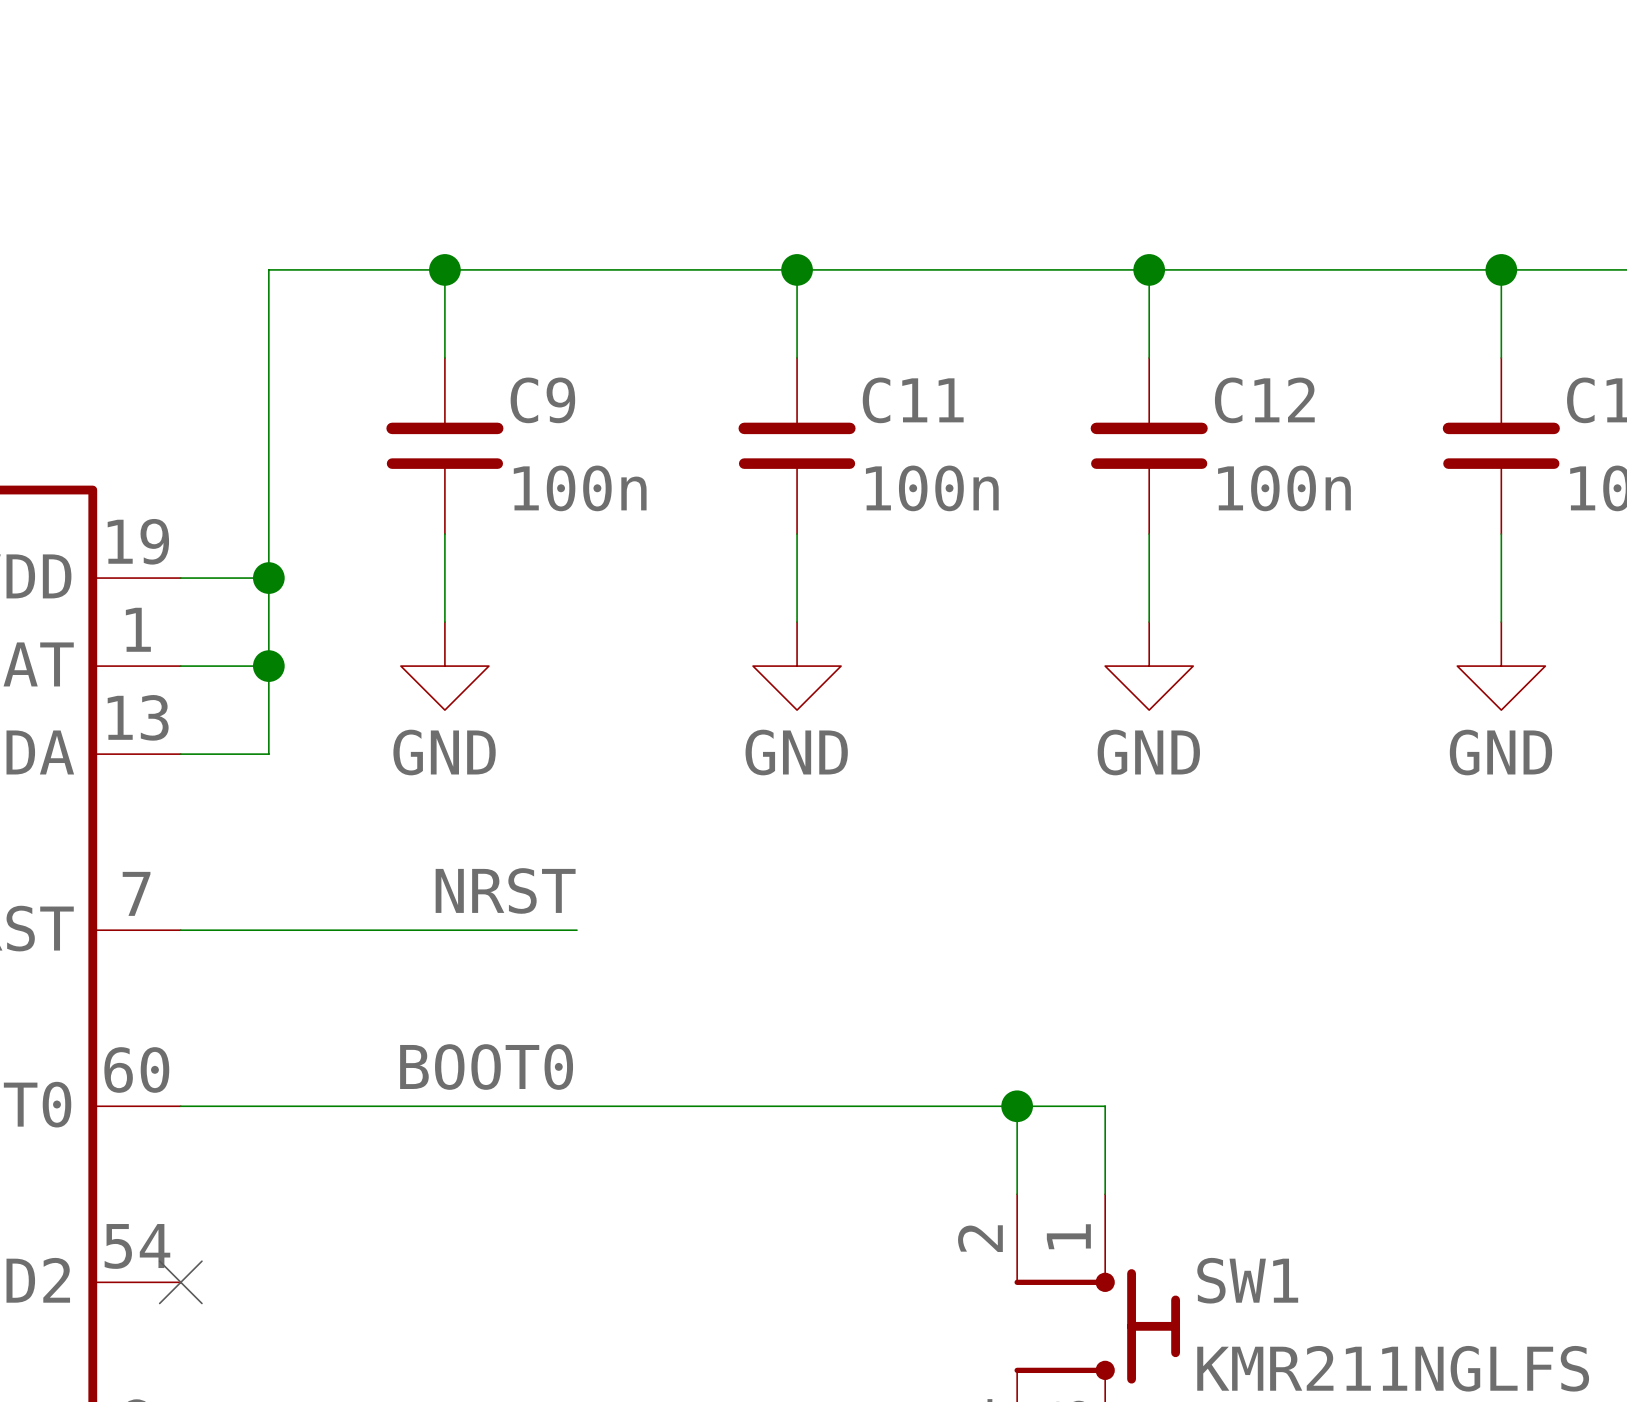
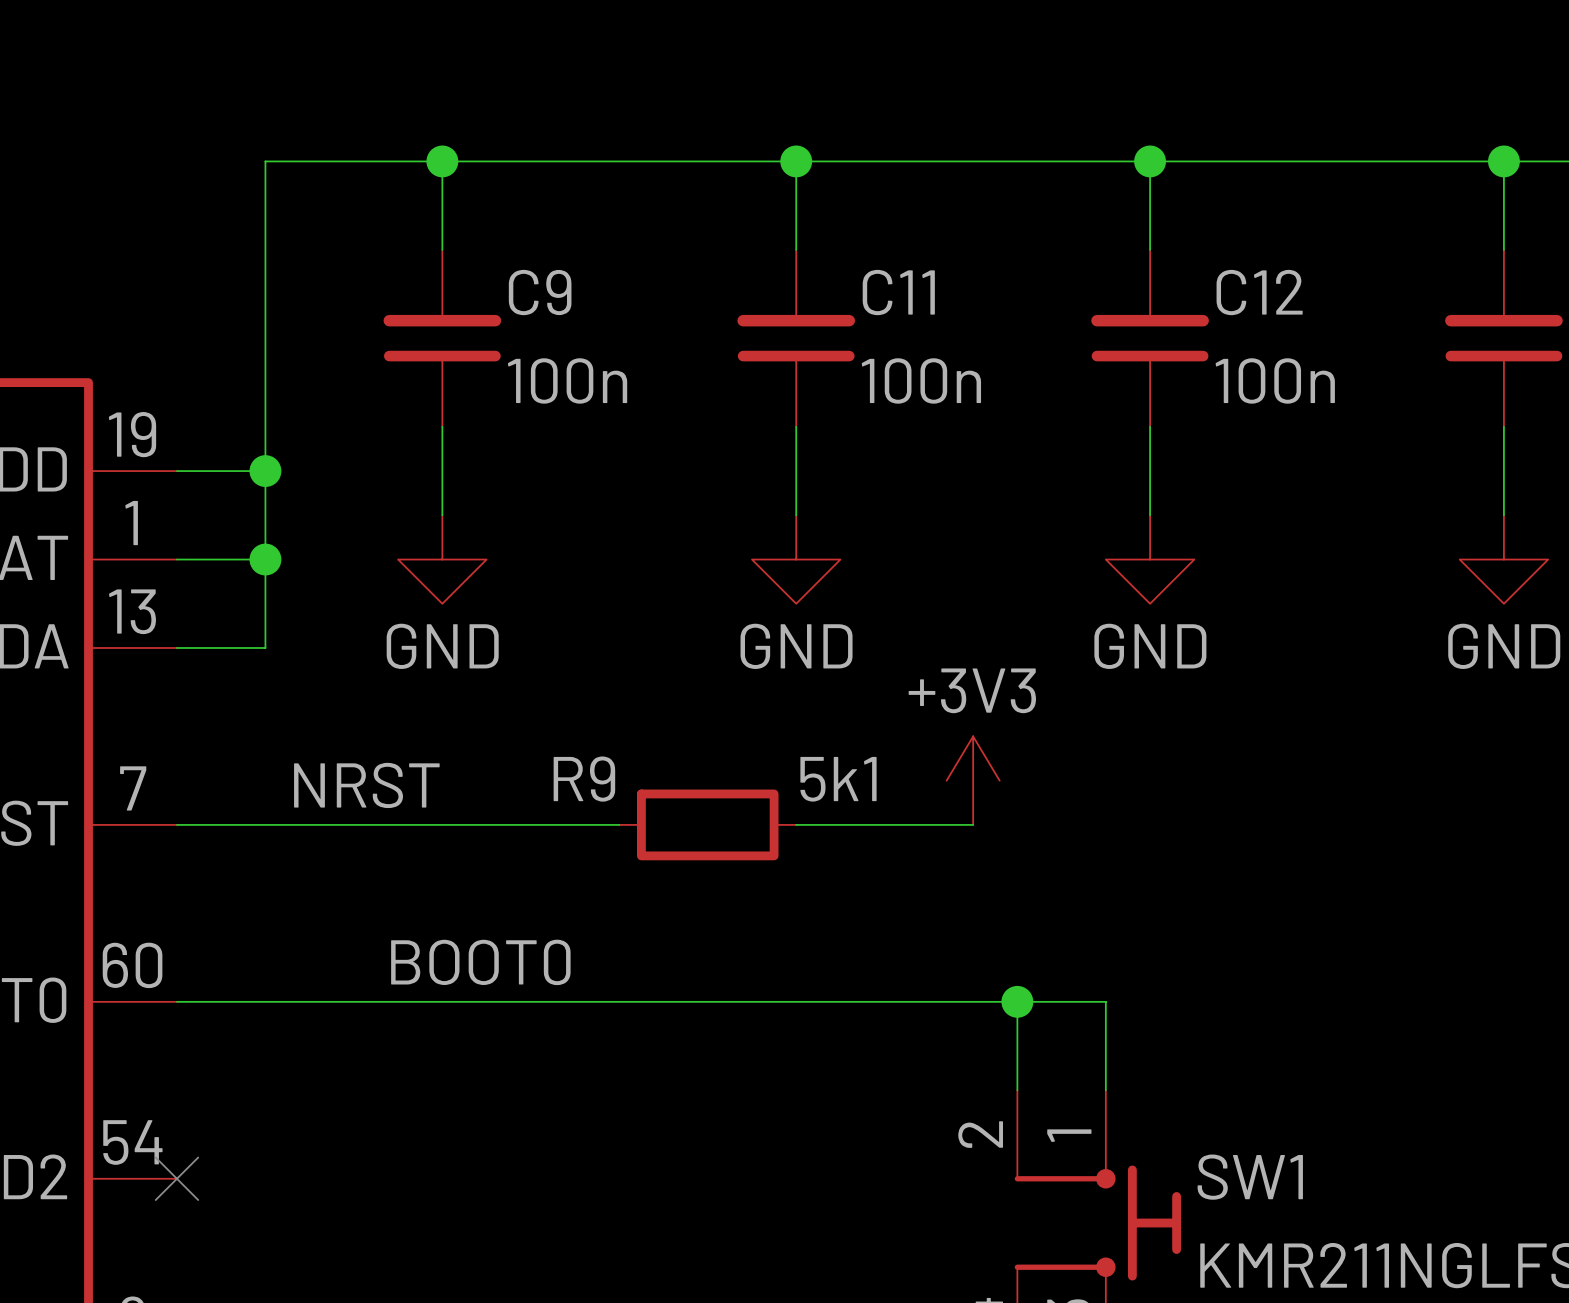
power symbol: none -> +3V3 (973, 780)
label position: NRST (505, 890) -> NRST (366, 785)
wire: none -> (575, 824) (619, 824)
R9: none -> (707, 824)
wire: none -> (796, 824) (973, 824)

